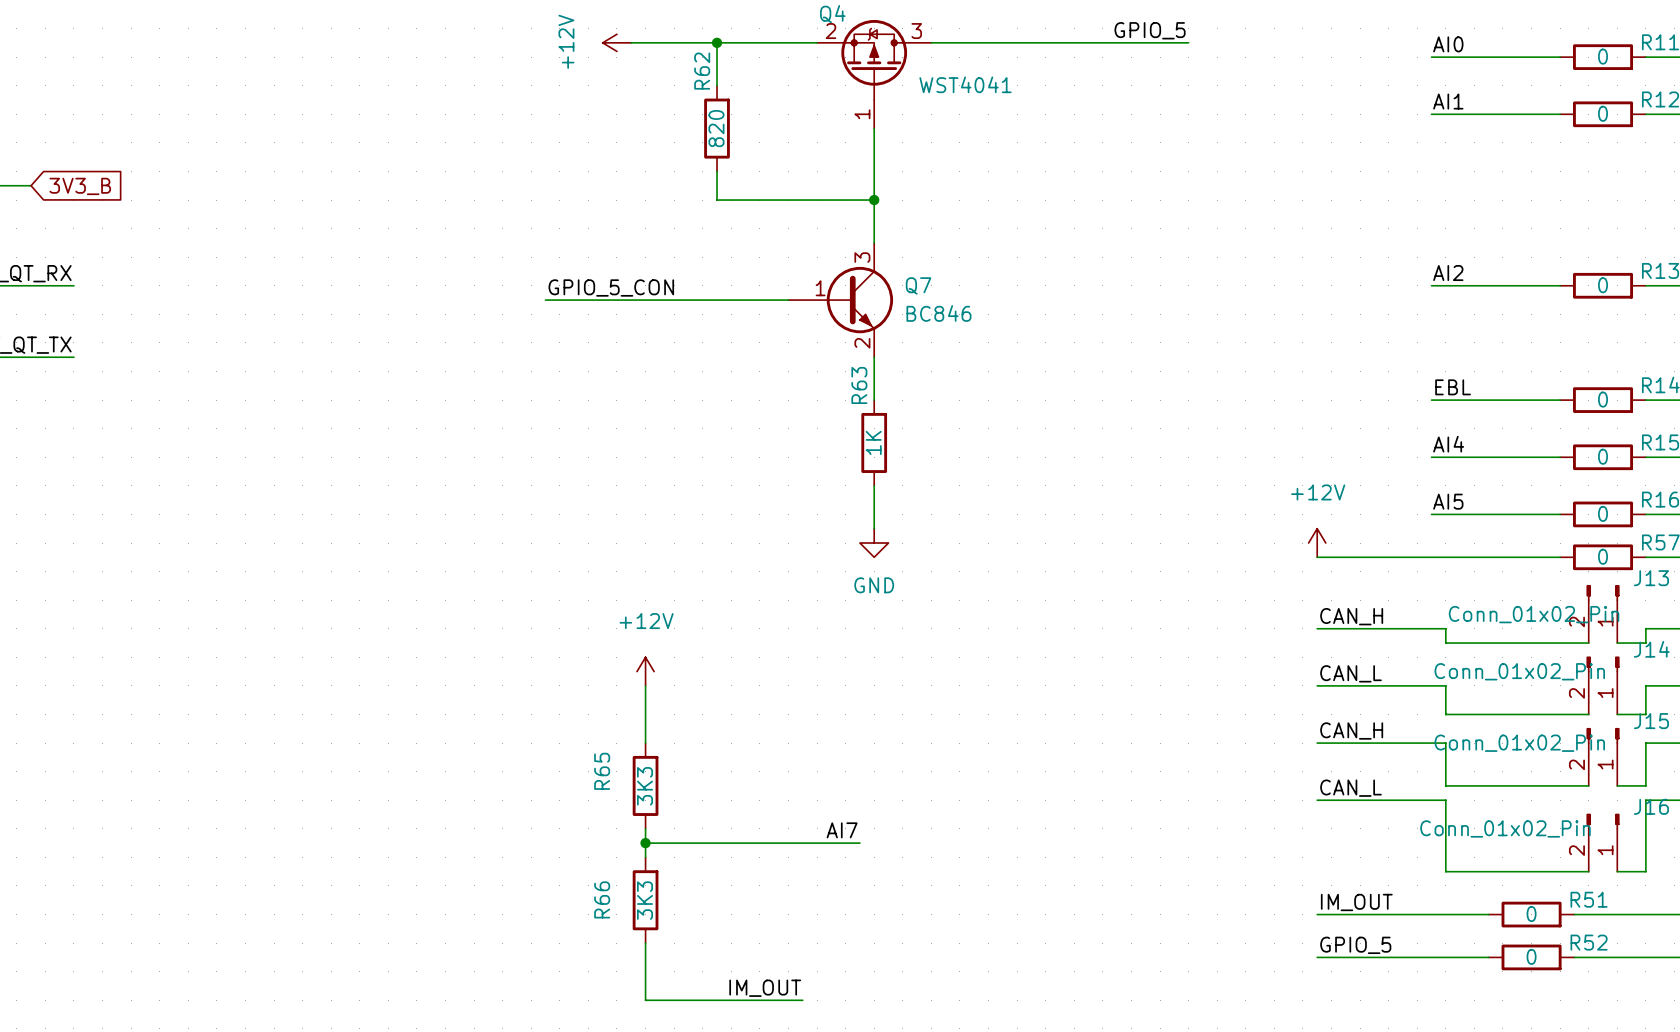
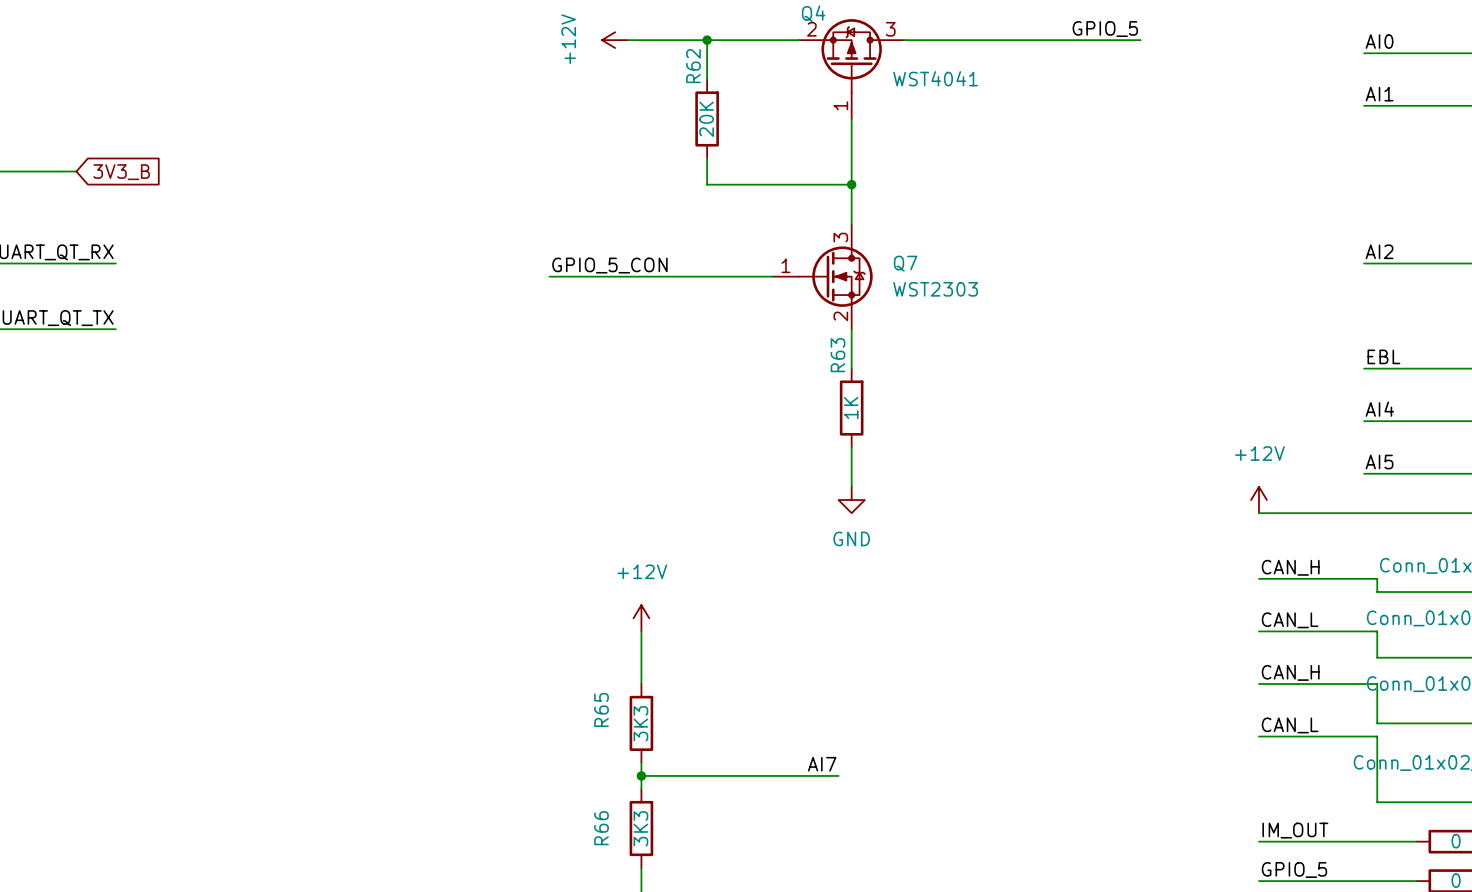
R62 value: 820 (716, 128) -> 20K (706, 119)
Q7 symbol: [788, 242, 894, 358] -> [772, 224, 873, 330]
Q7 value: BC846 (938, 313) -> WST2303 (935, 289)

